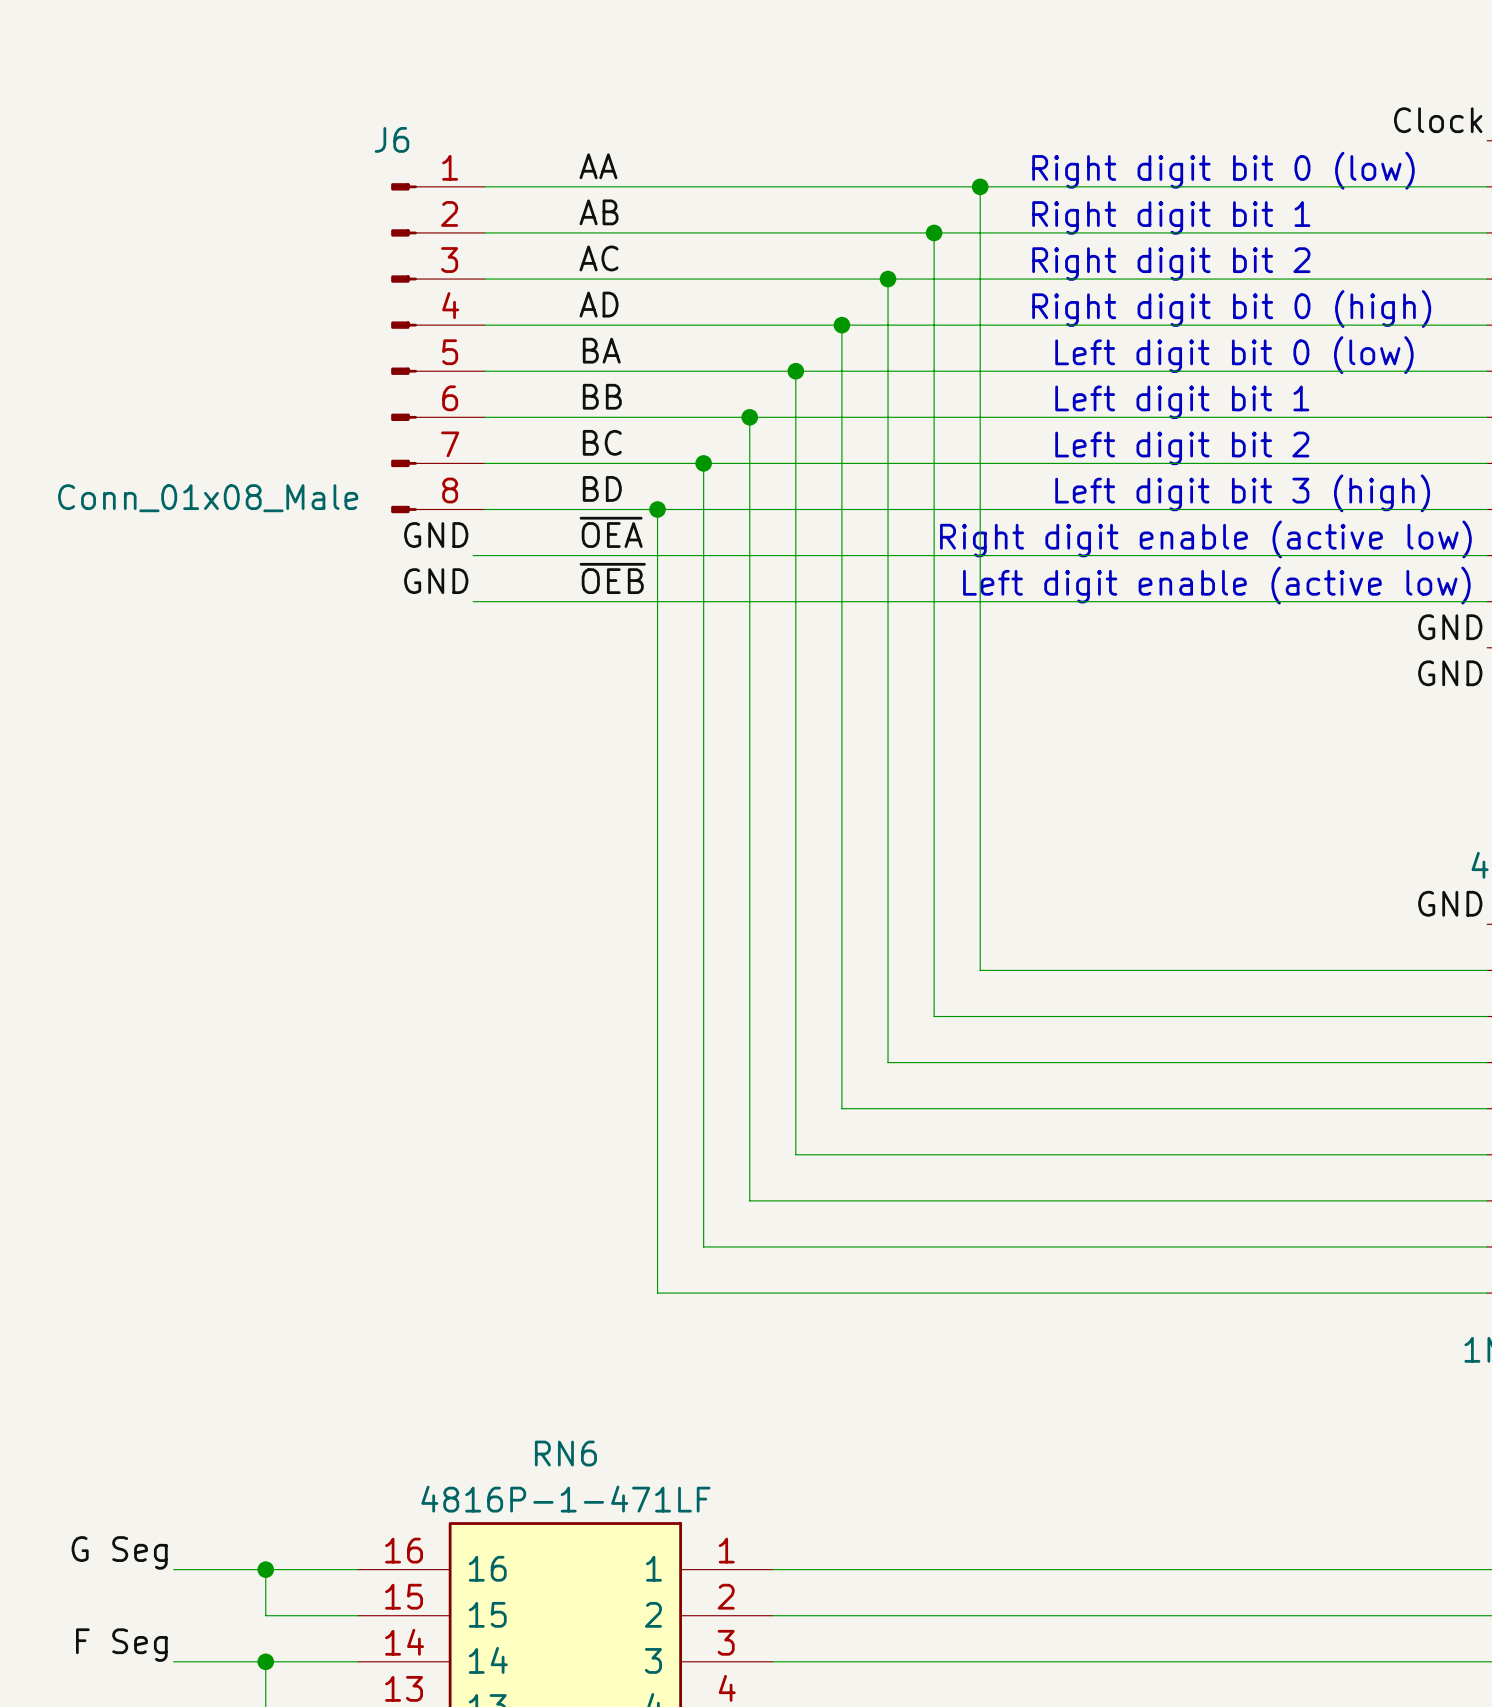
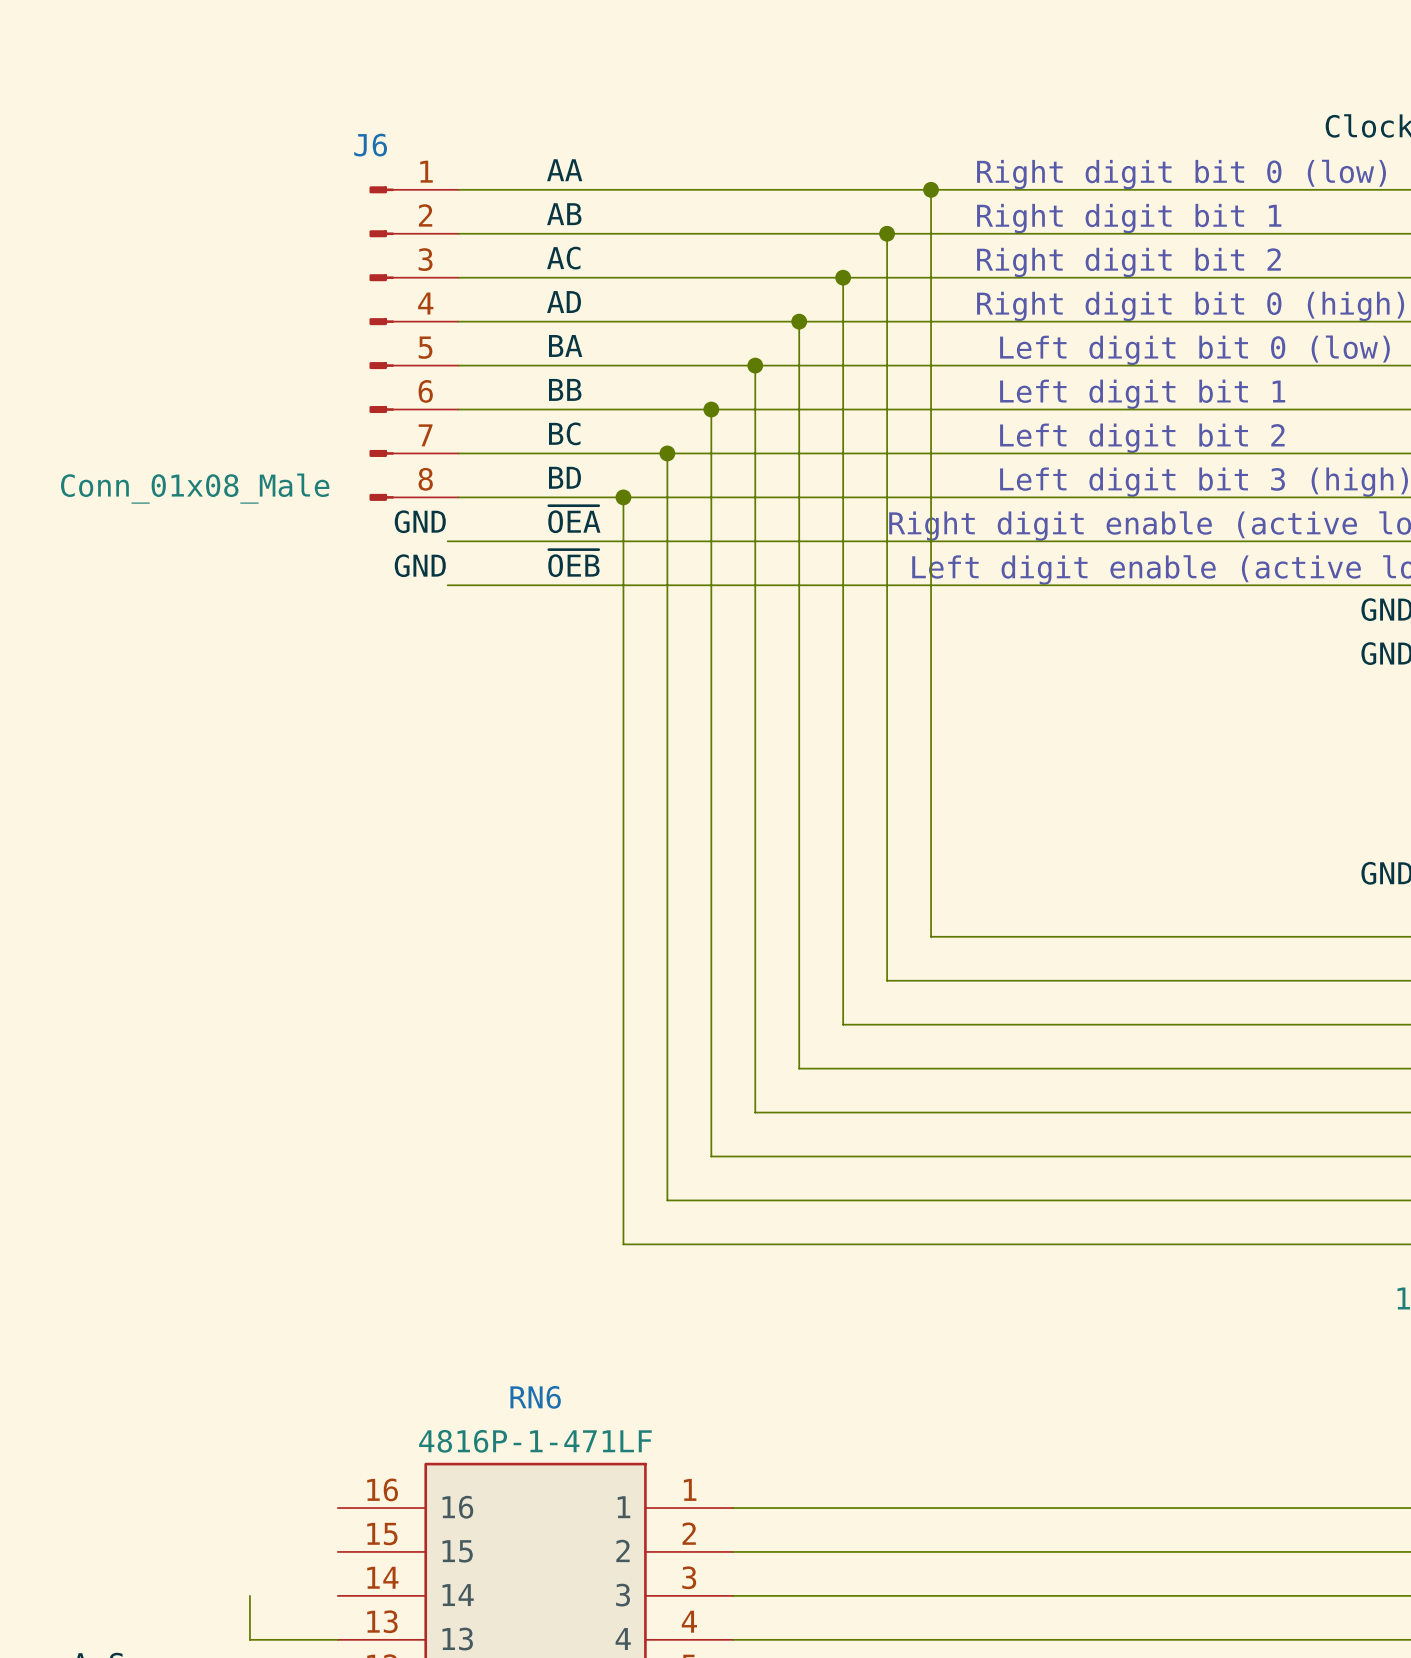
label: G Seg (119, 1552) -> none
wire: (173, 1569) (357, 1569) -> none
wire: (265, 1569) (265, 1615) (357, 1615) -> none
junction: (265, 1569) -> none
label: F Seg (121, 1645) -> none
wire: (173, 1661) (357, 1661) -> none
junction: (265, 1661) -> none

